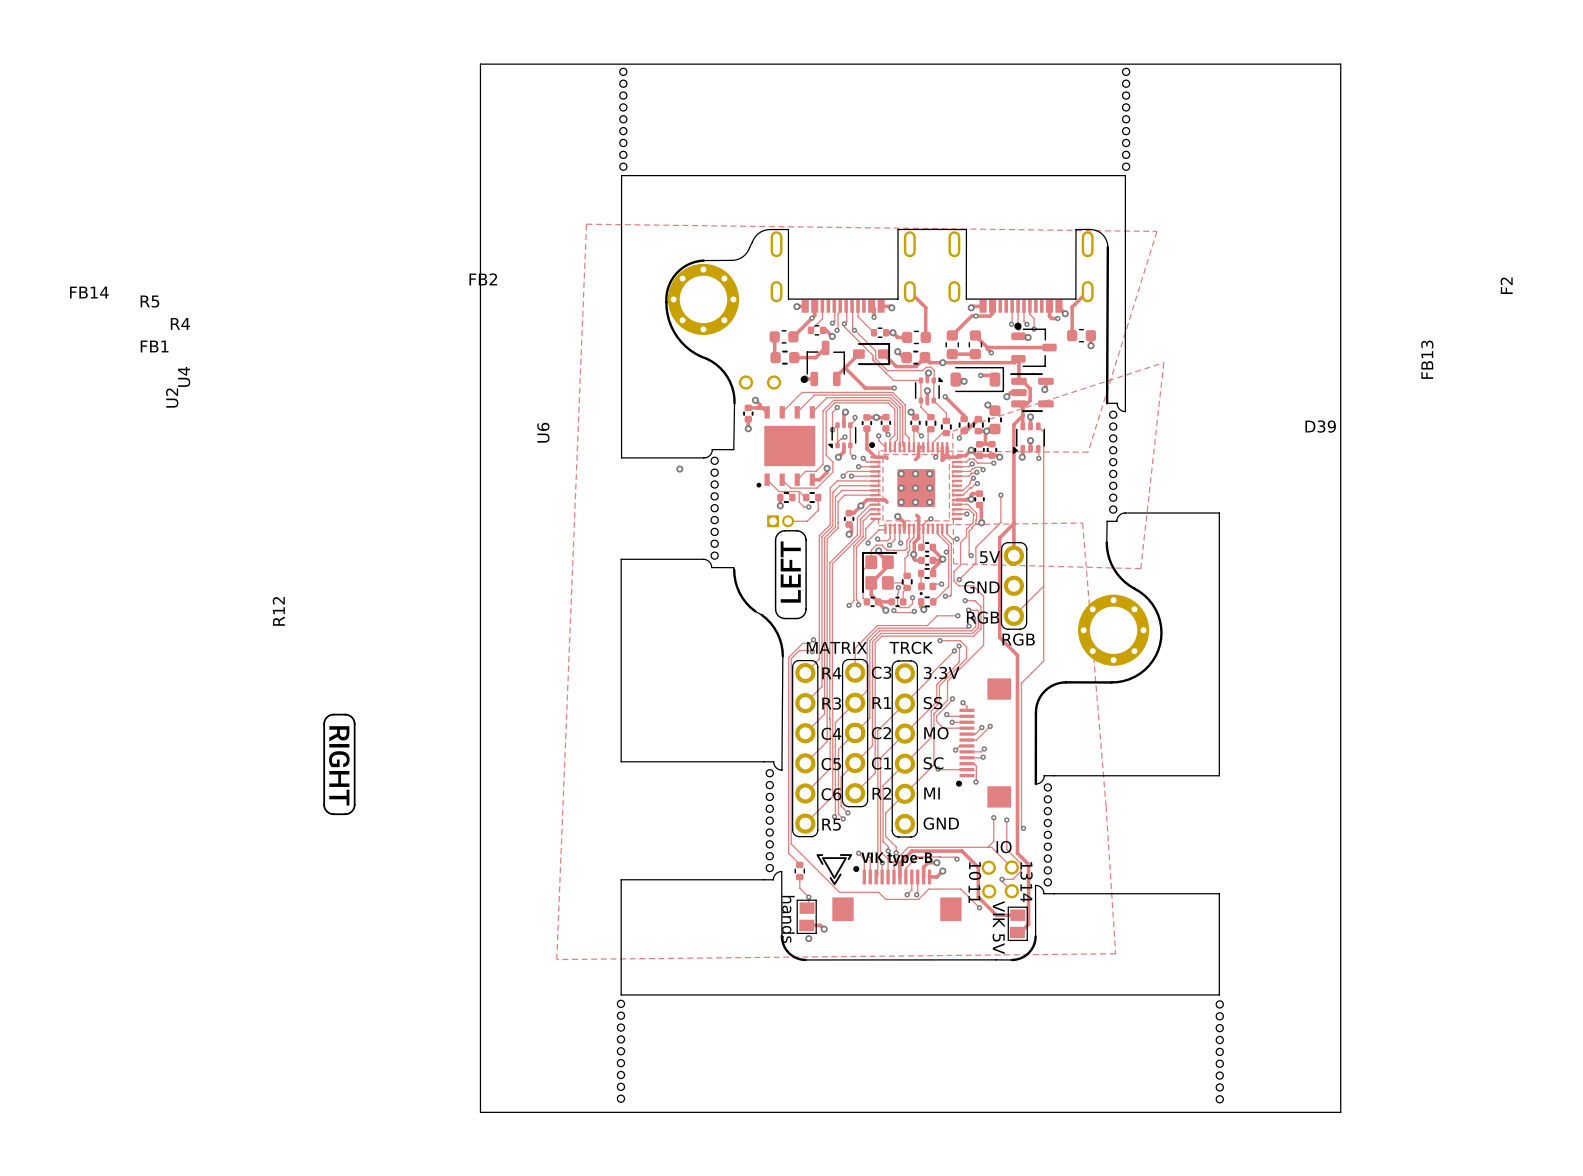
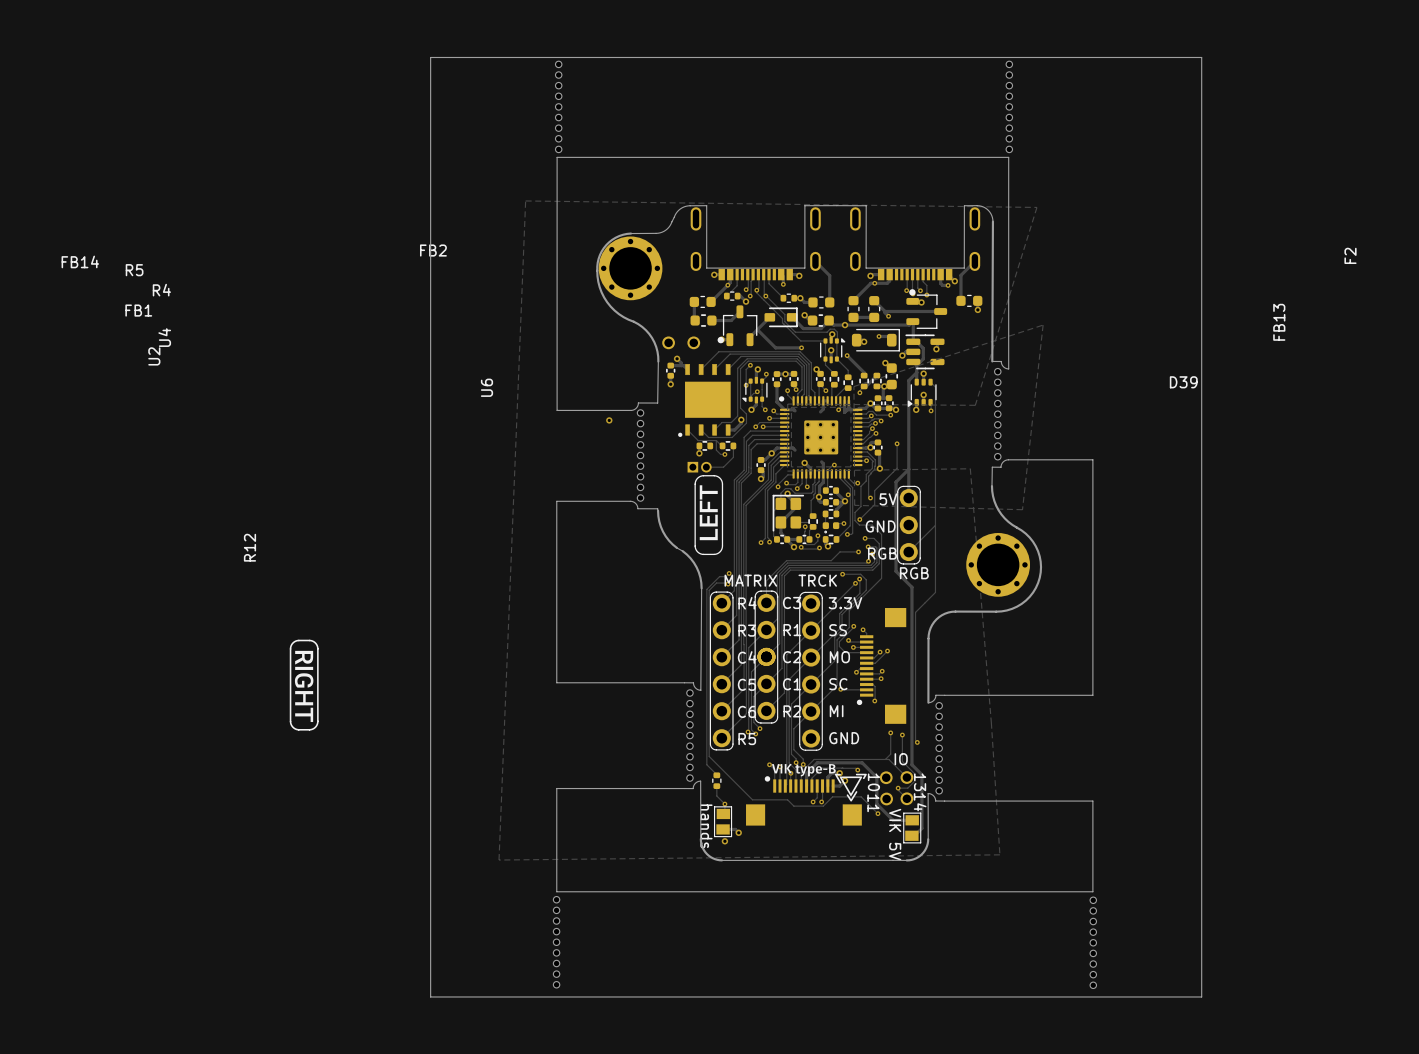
drawing position: (834, 869) -> (850, 787)

